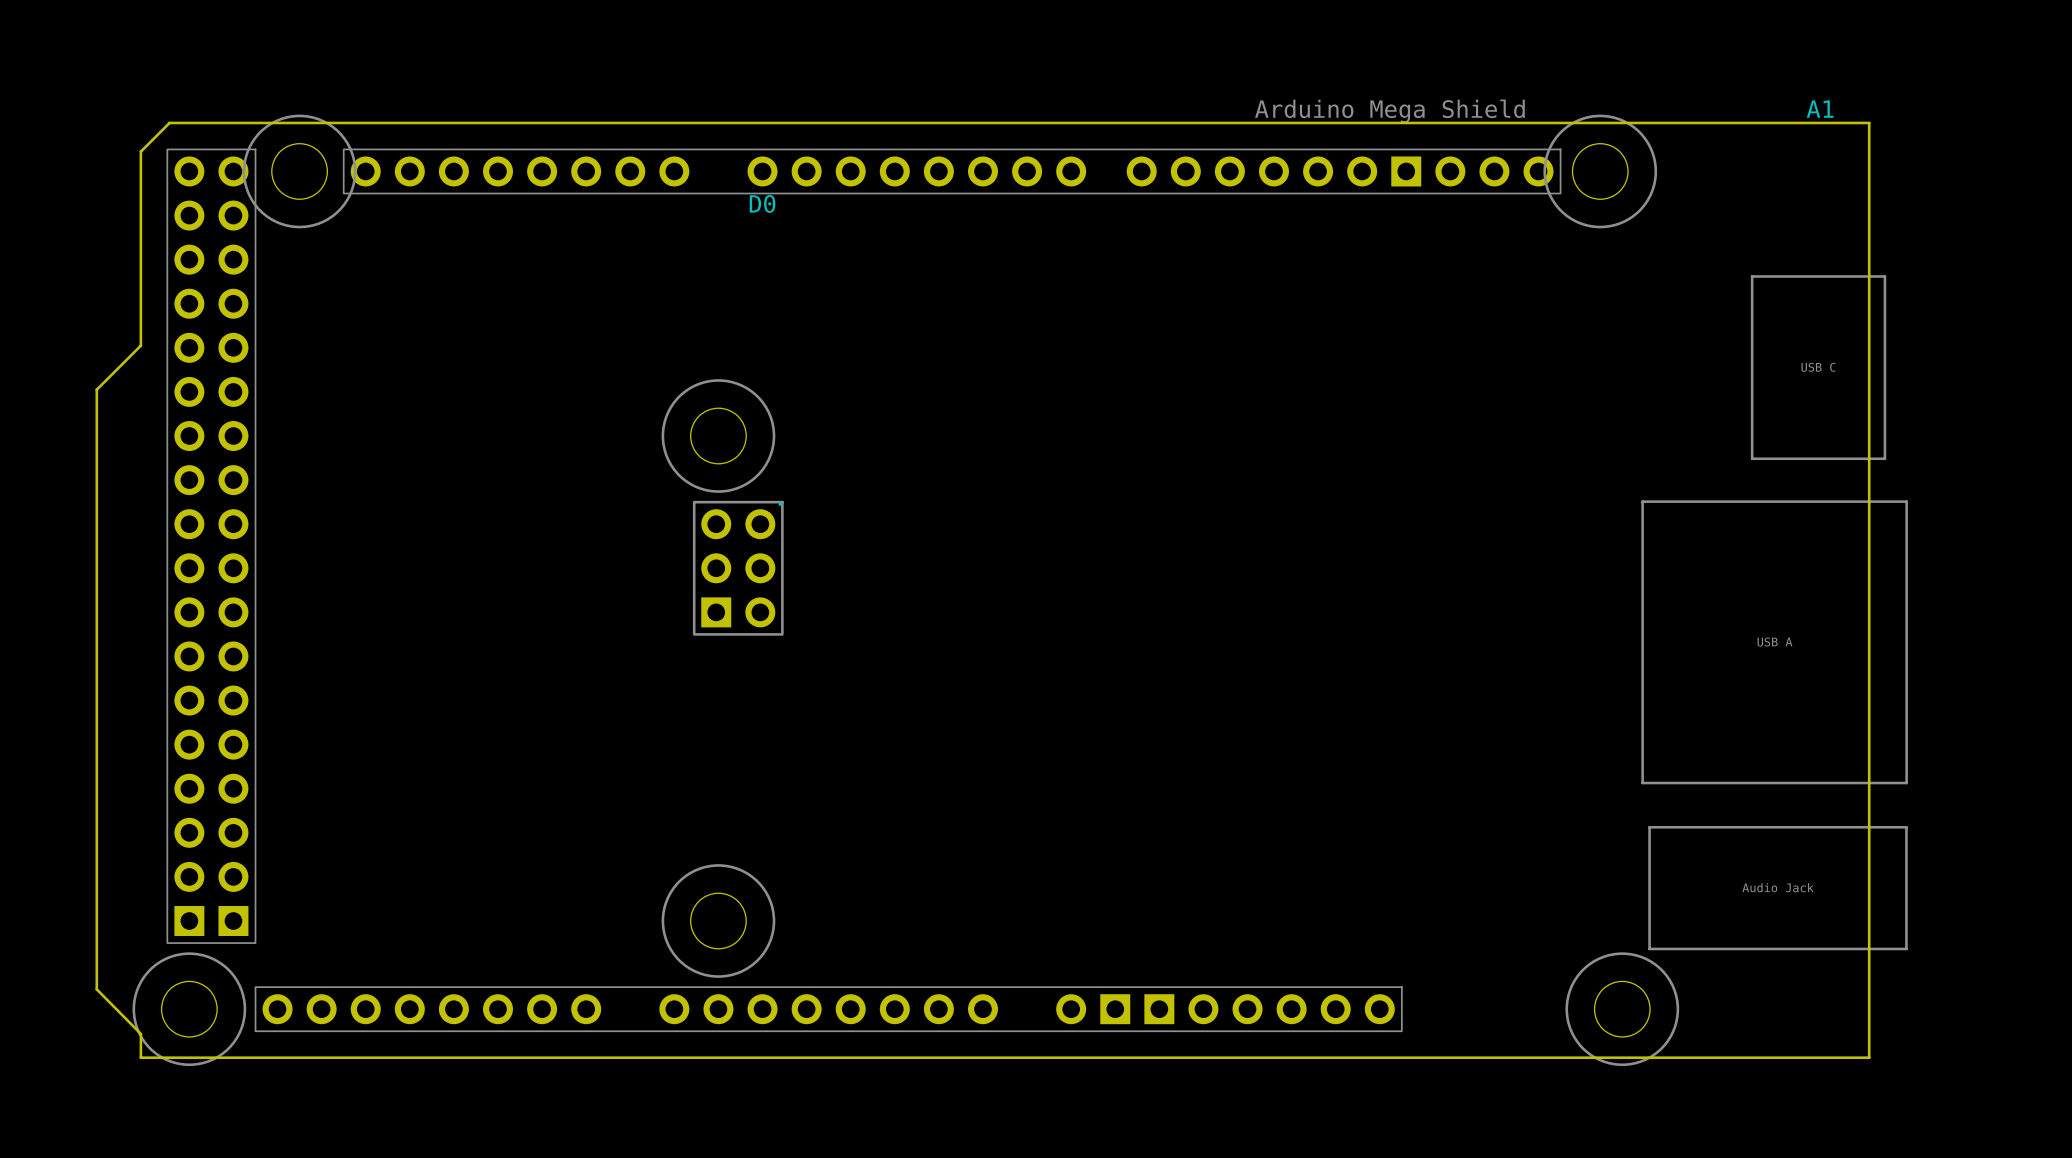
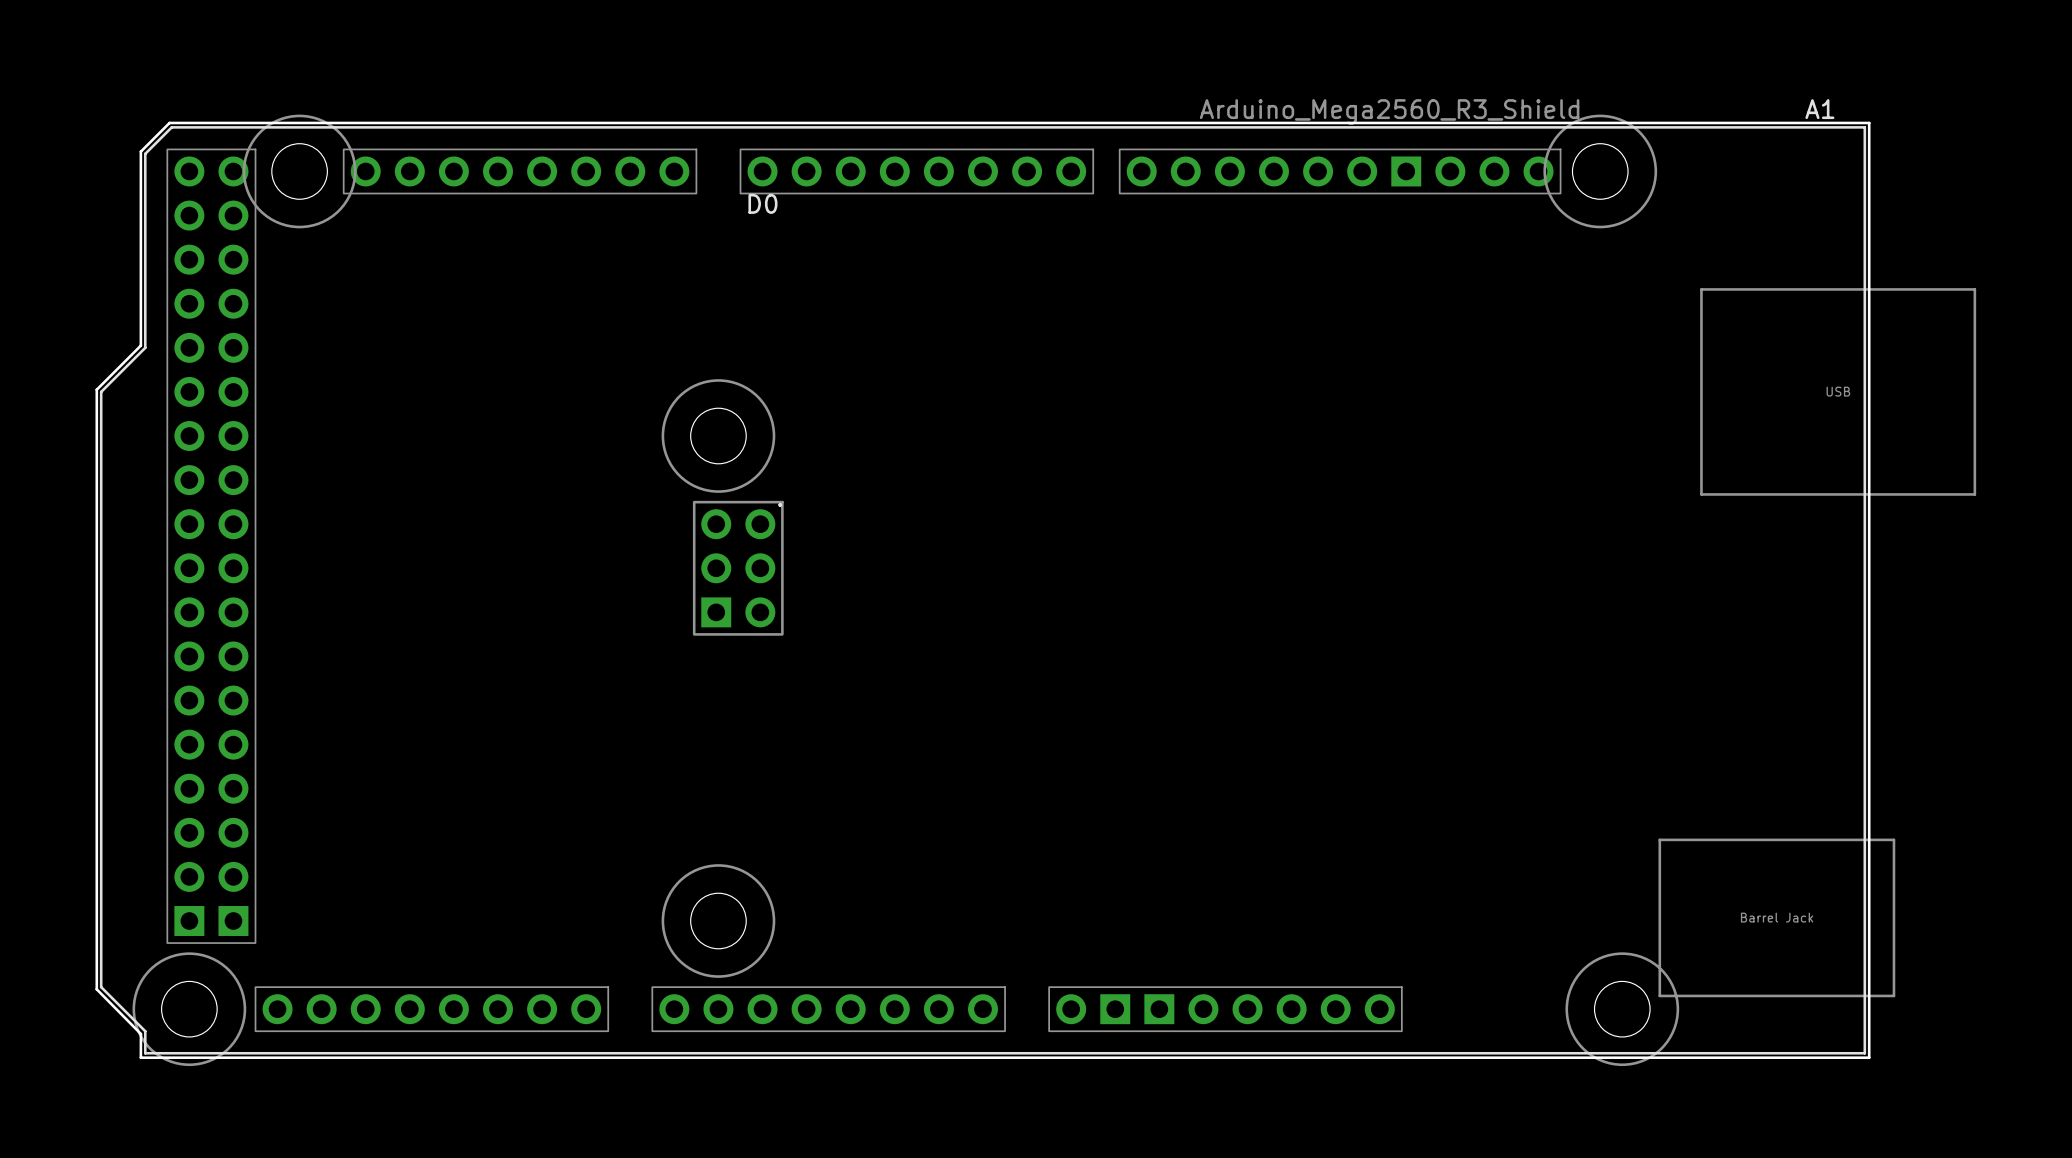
A1 value: Arduino_Mega_Shield (1389, 111) -> Arduino_Mega2560_R3_Shield (1389, 111)
A1 footprint: [132, 114, 1908, 1067] -> [99, 114, 1977, 1067]

